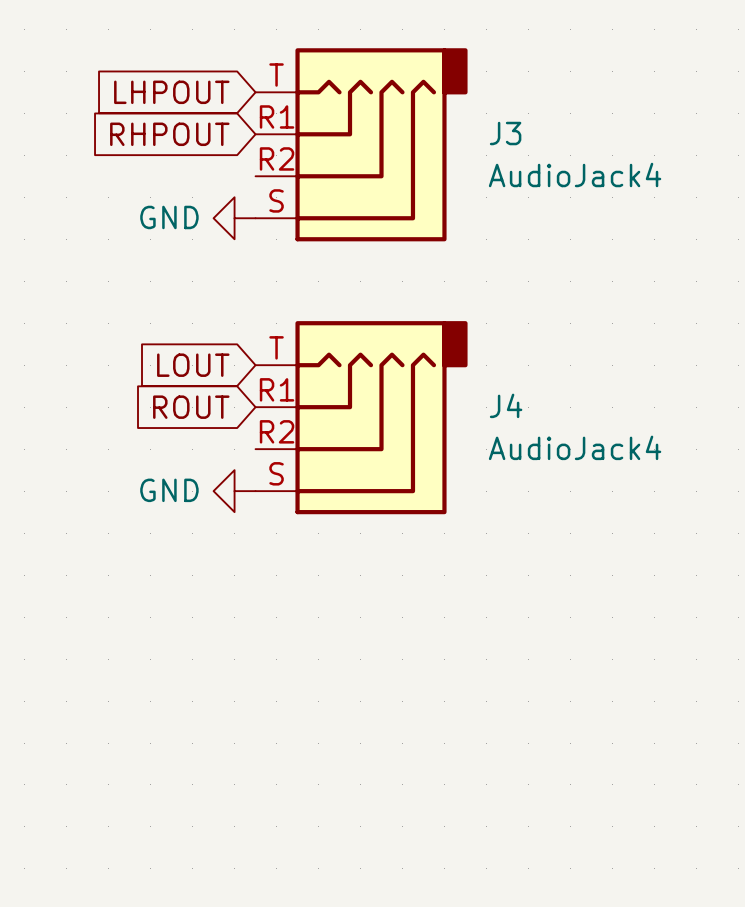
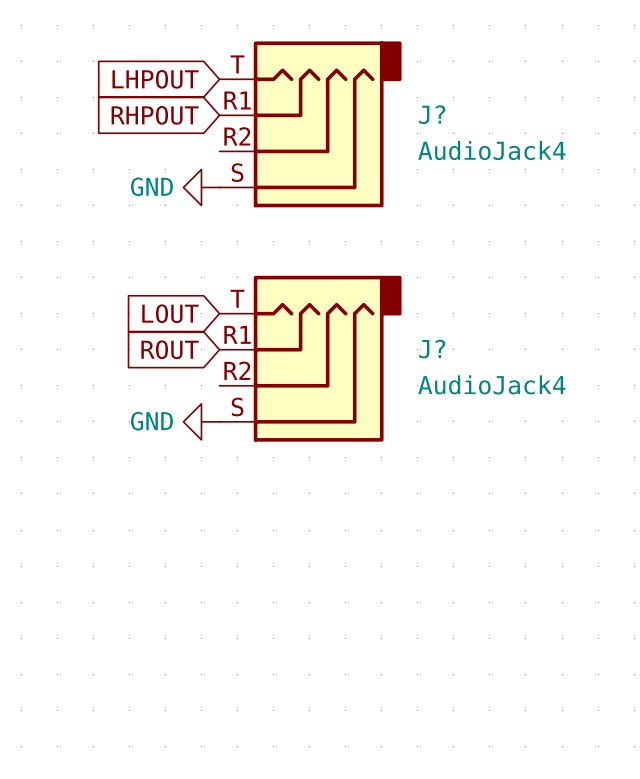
J3 name: J3 (505, 133) -> J? (432, 114)
J4 name: J4 (506, 405) -> J? (432, 349)

